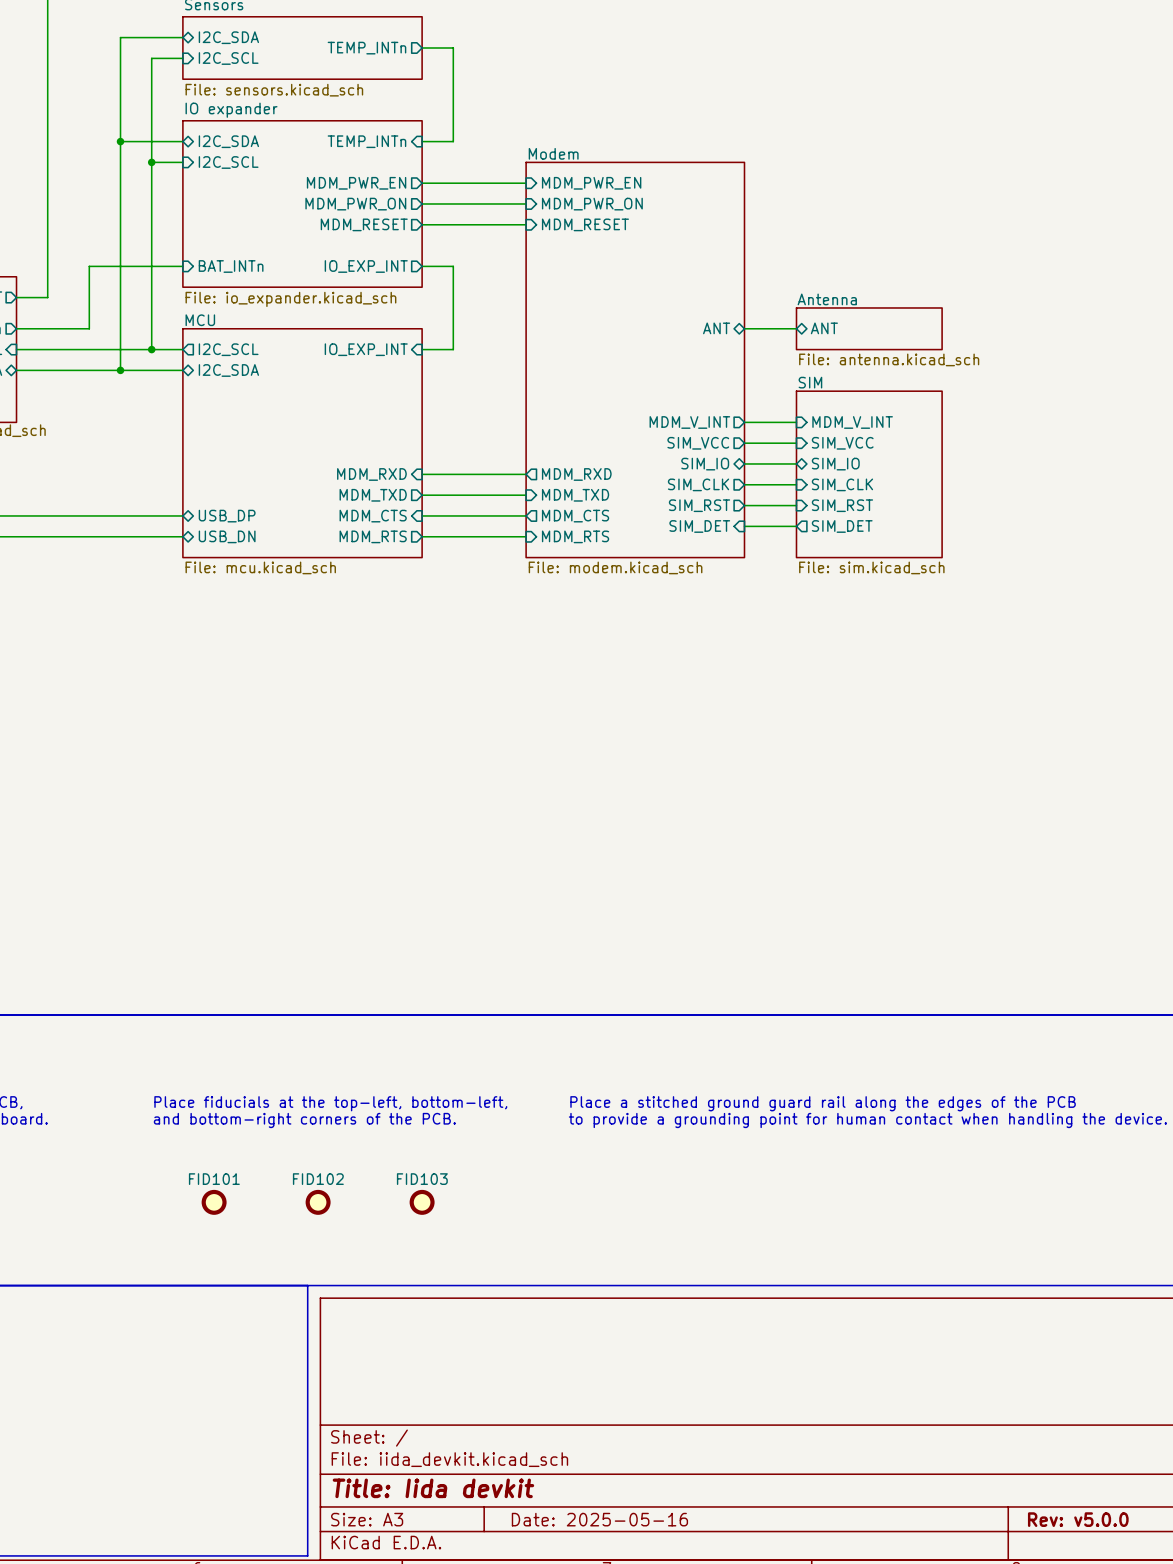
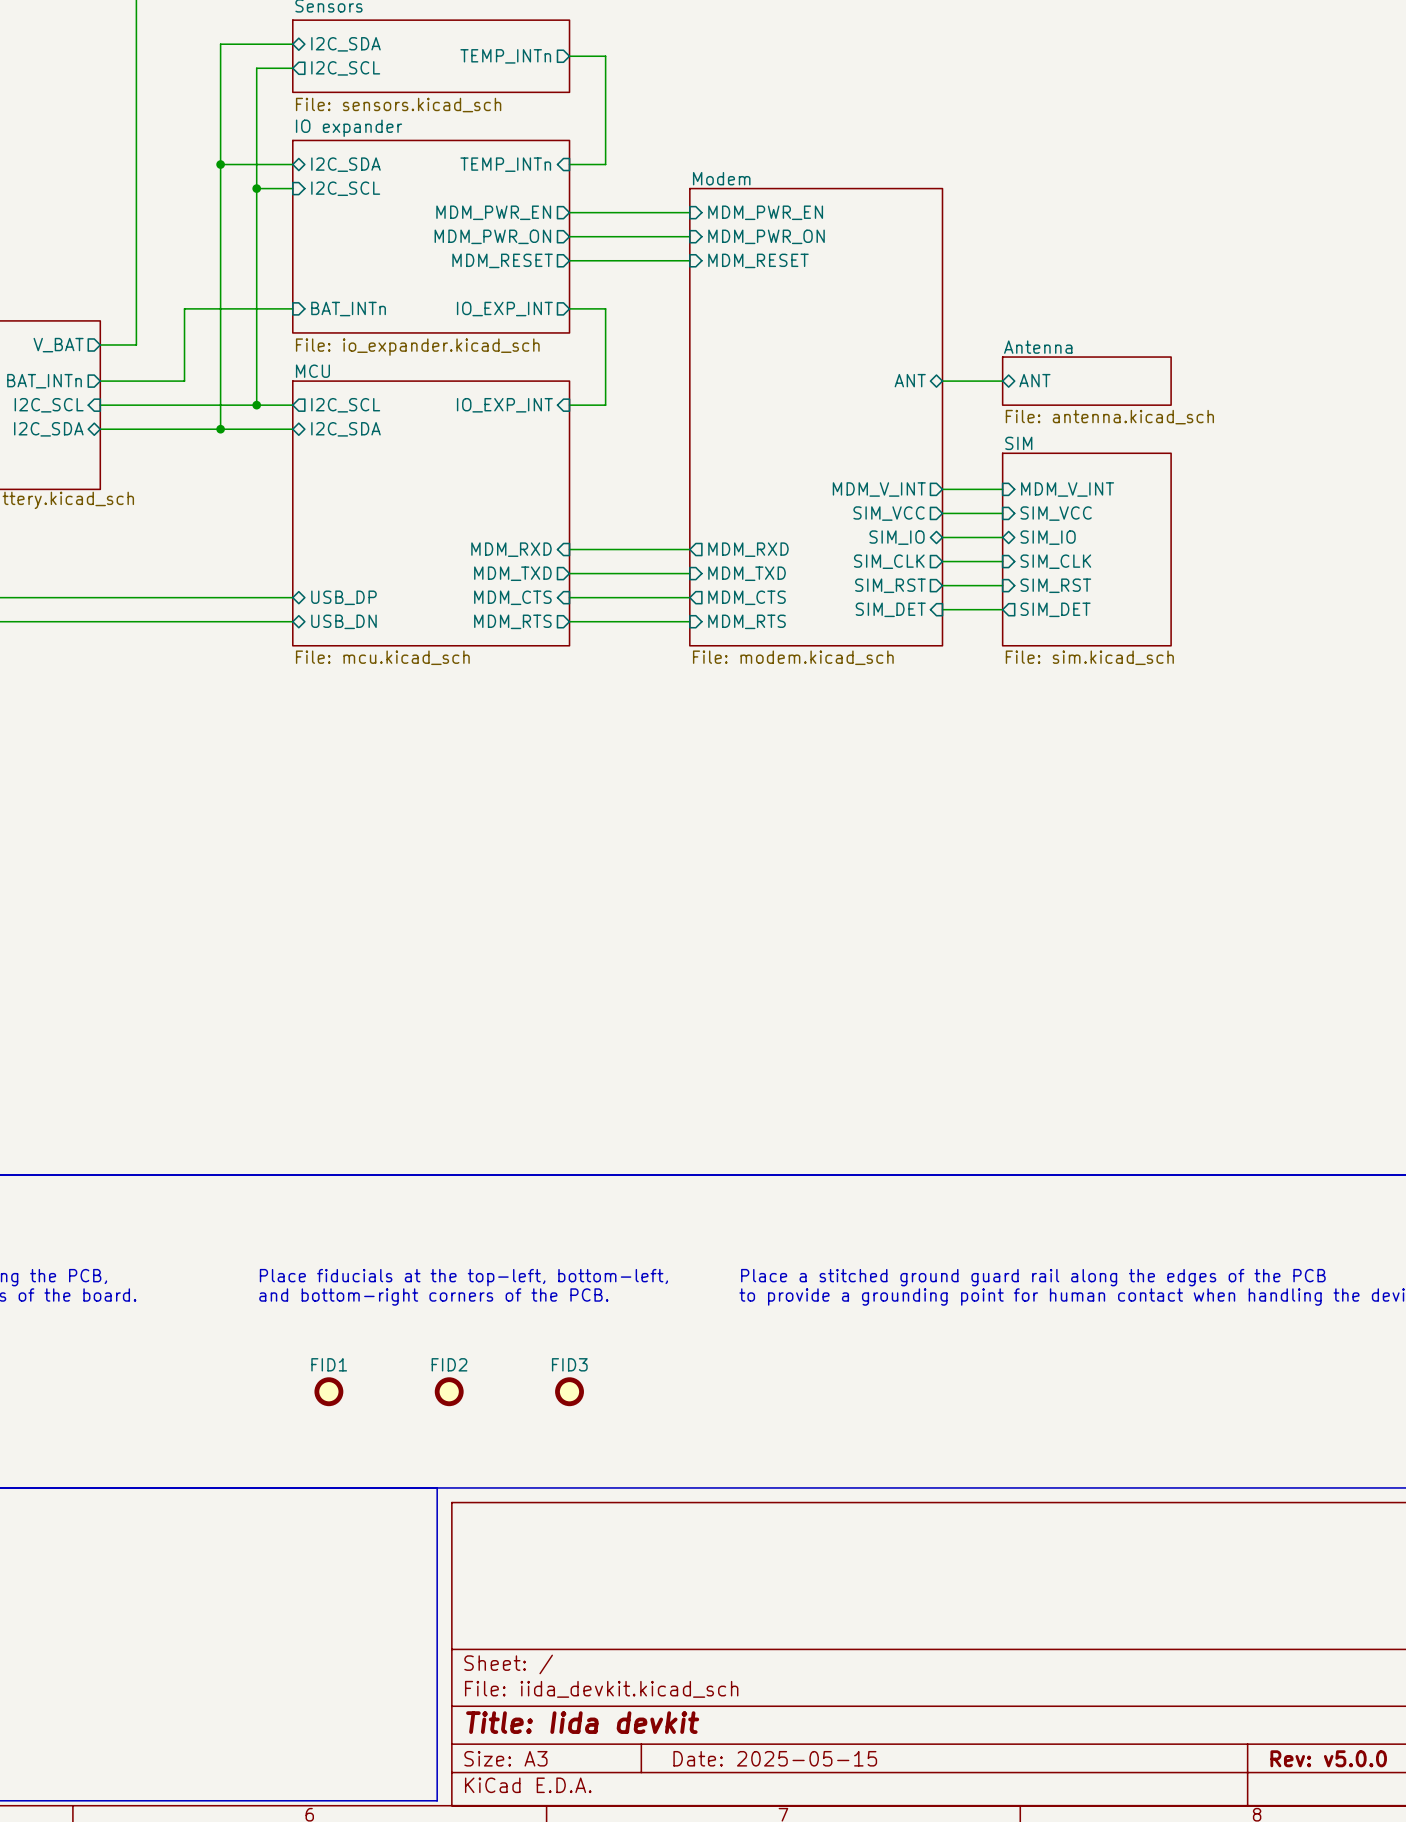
sheet pin shape: input (228, 58) -> output (345, 68)
FID101 name: FID101 (214, 1179) -> FID1 (329, 1364)
FID102 name: FID102 (318, 1179) -> FID2 (449, 1364)
FID103 name: FID103 (422, 1179) -> FID3 (569, 1364)
title block: Date: 2025-05-16 (599, 1519) -> Date: 2025-05-15 (775, 1758)

